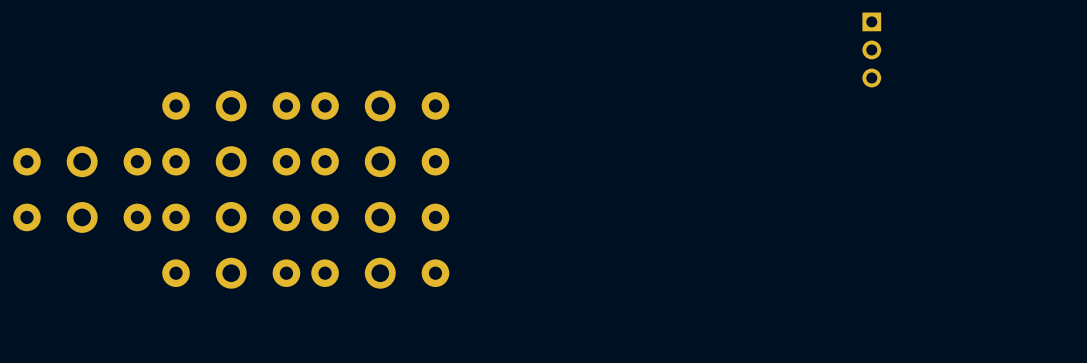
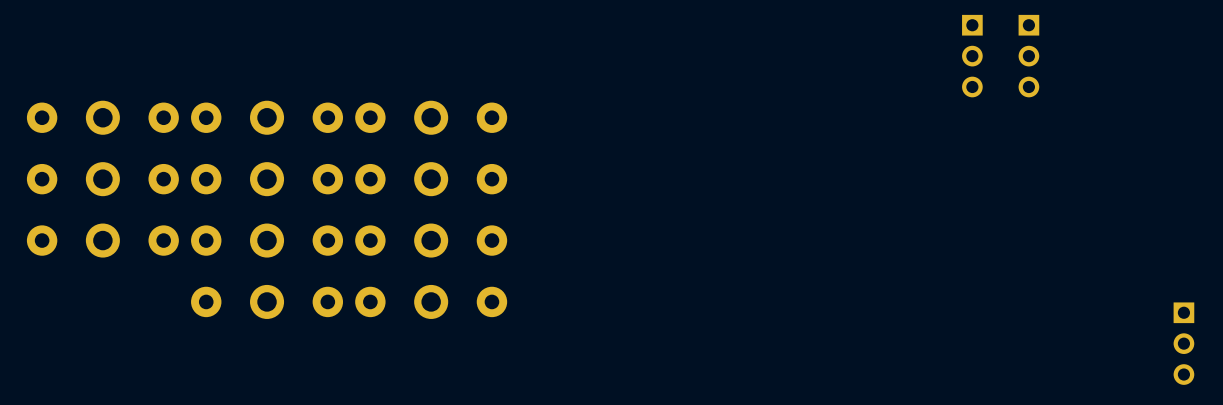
part: none -> (1028, 56)
part: none -> (102, 117)
part: none -> (1183, 343)

